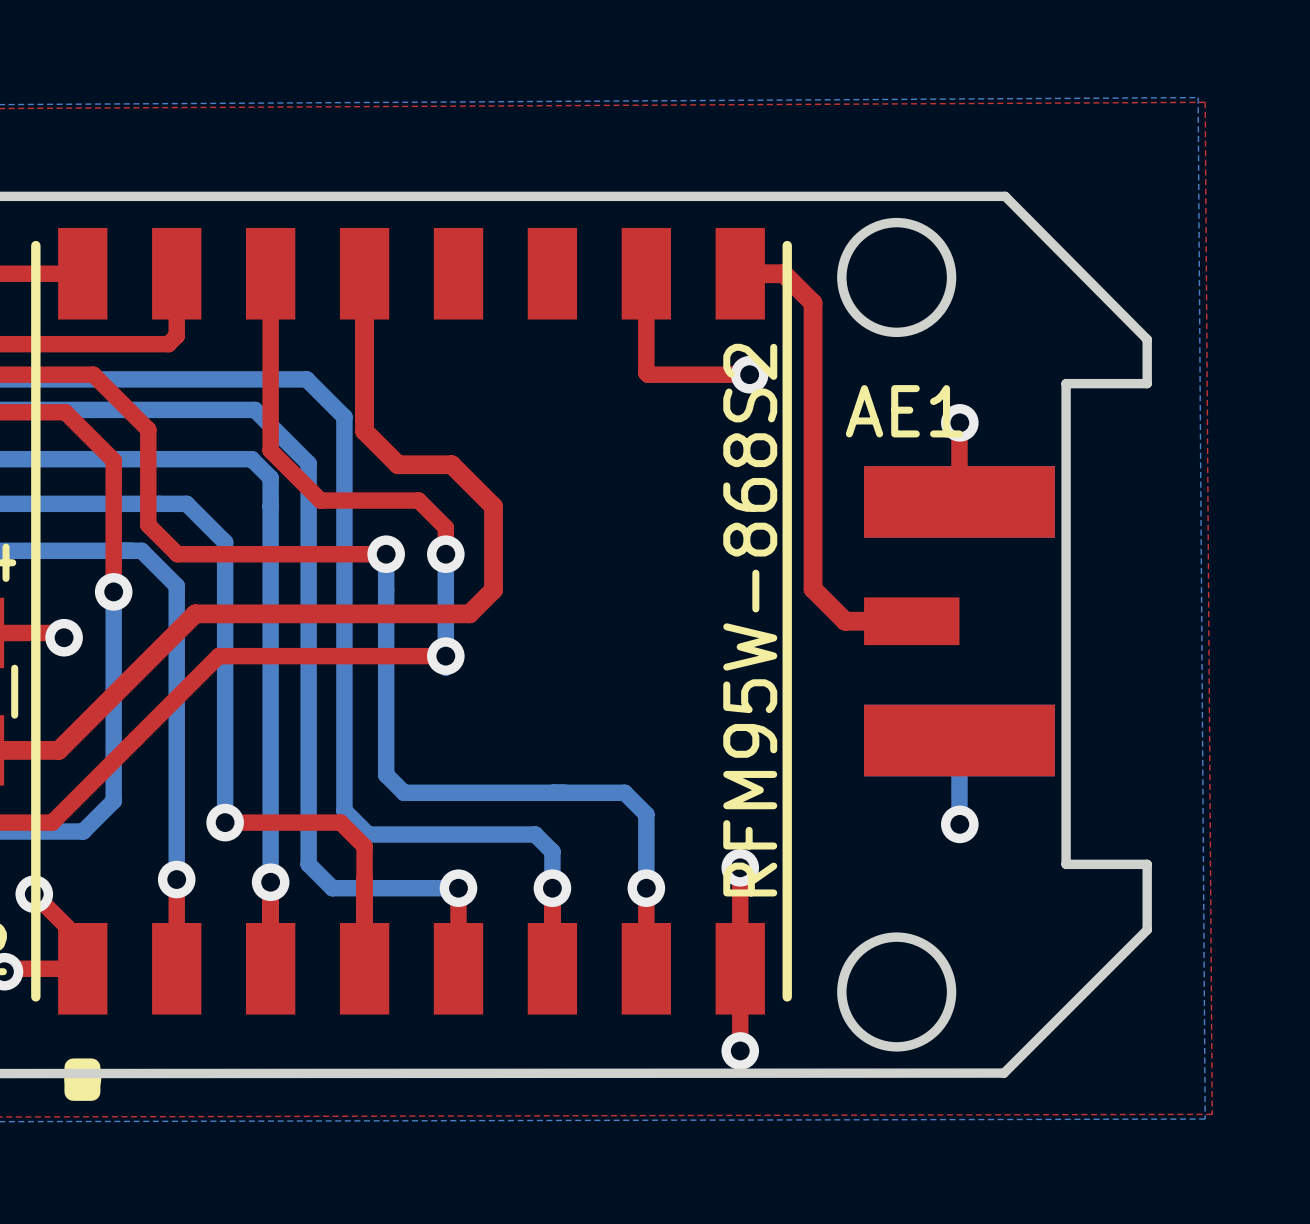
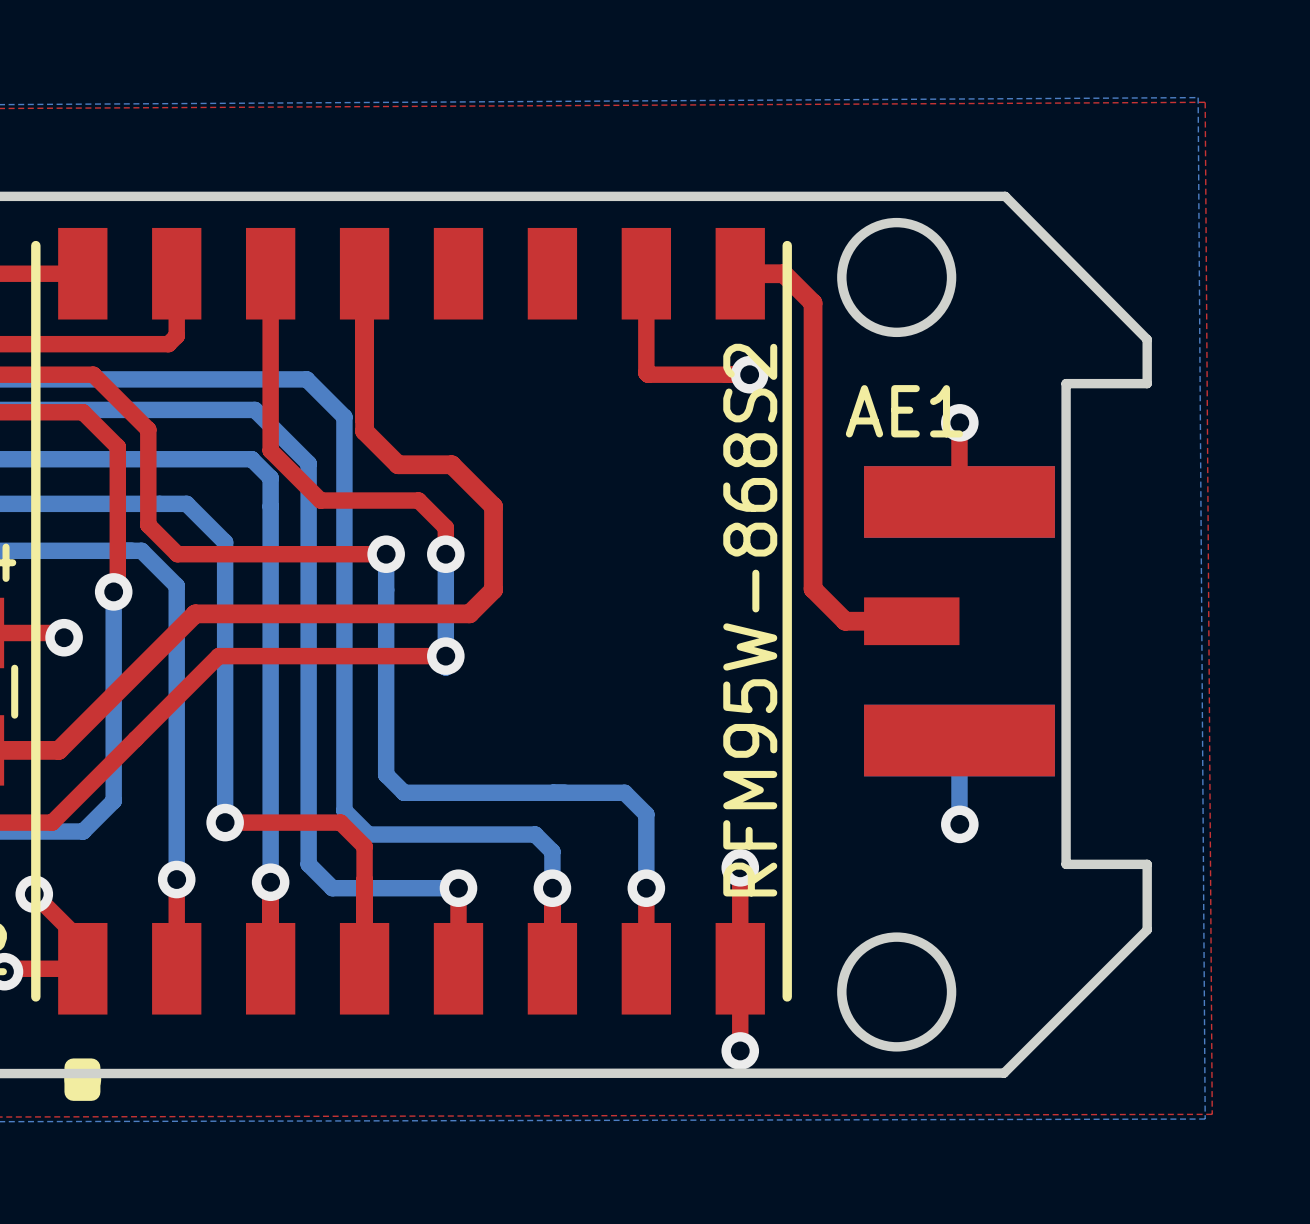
top track: (65, 412) (113, 460) (113, 591) -> (65, 412) (83, 412) (117, 446) (117, 595)

